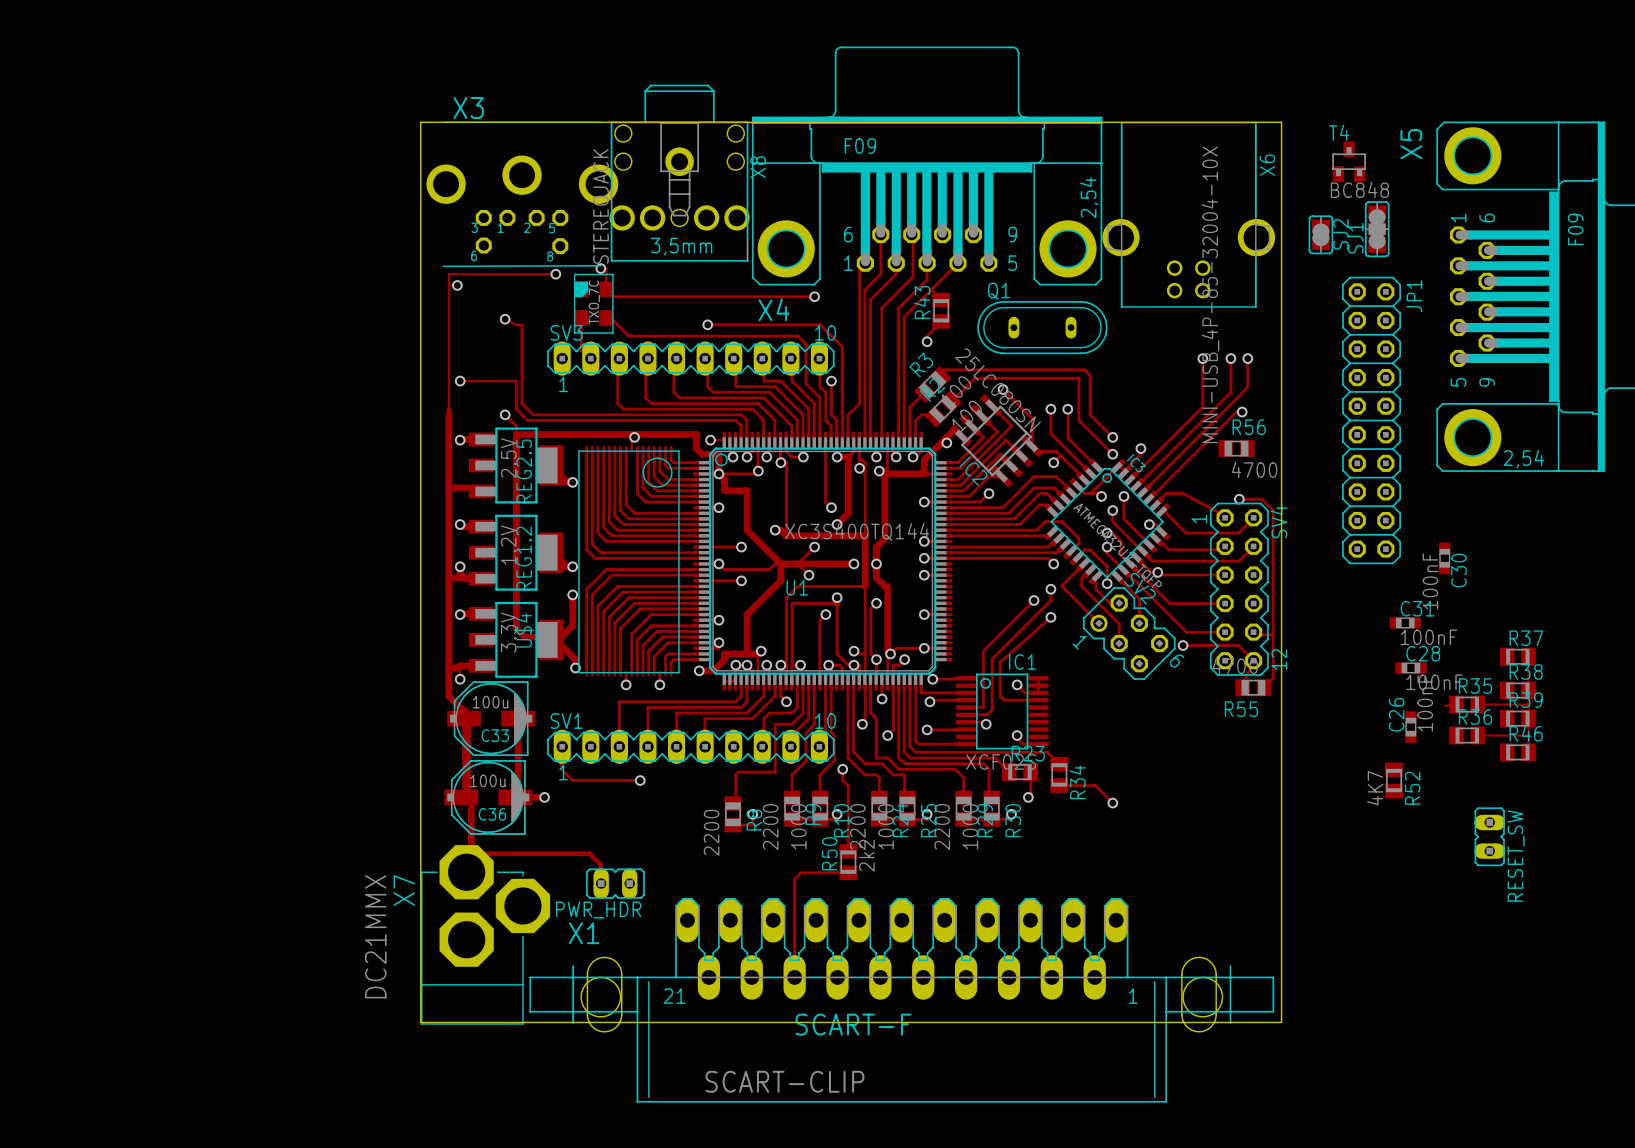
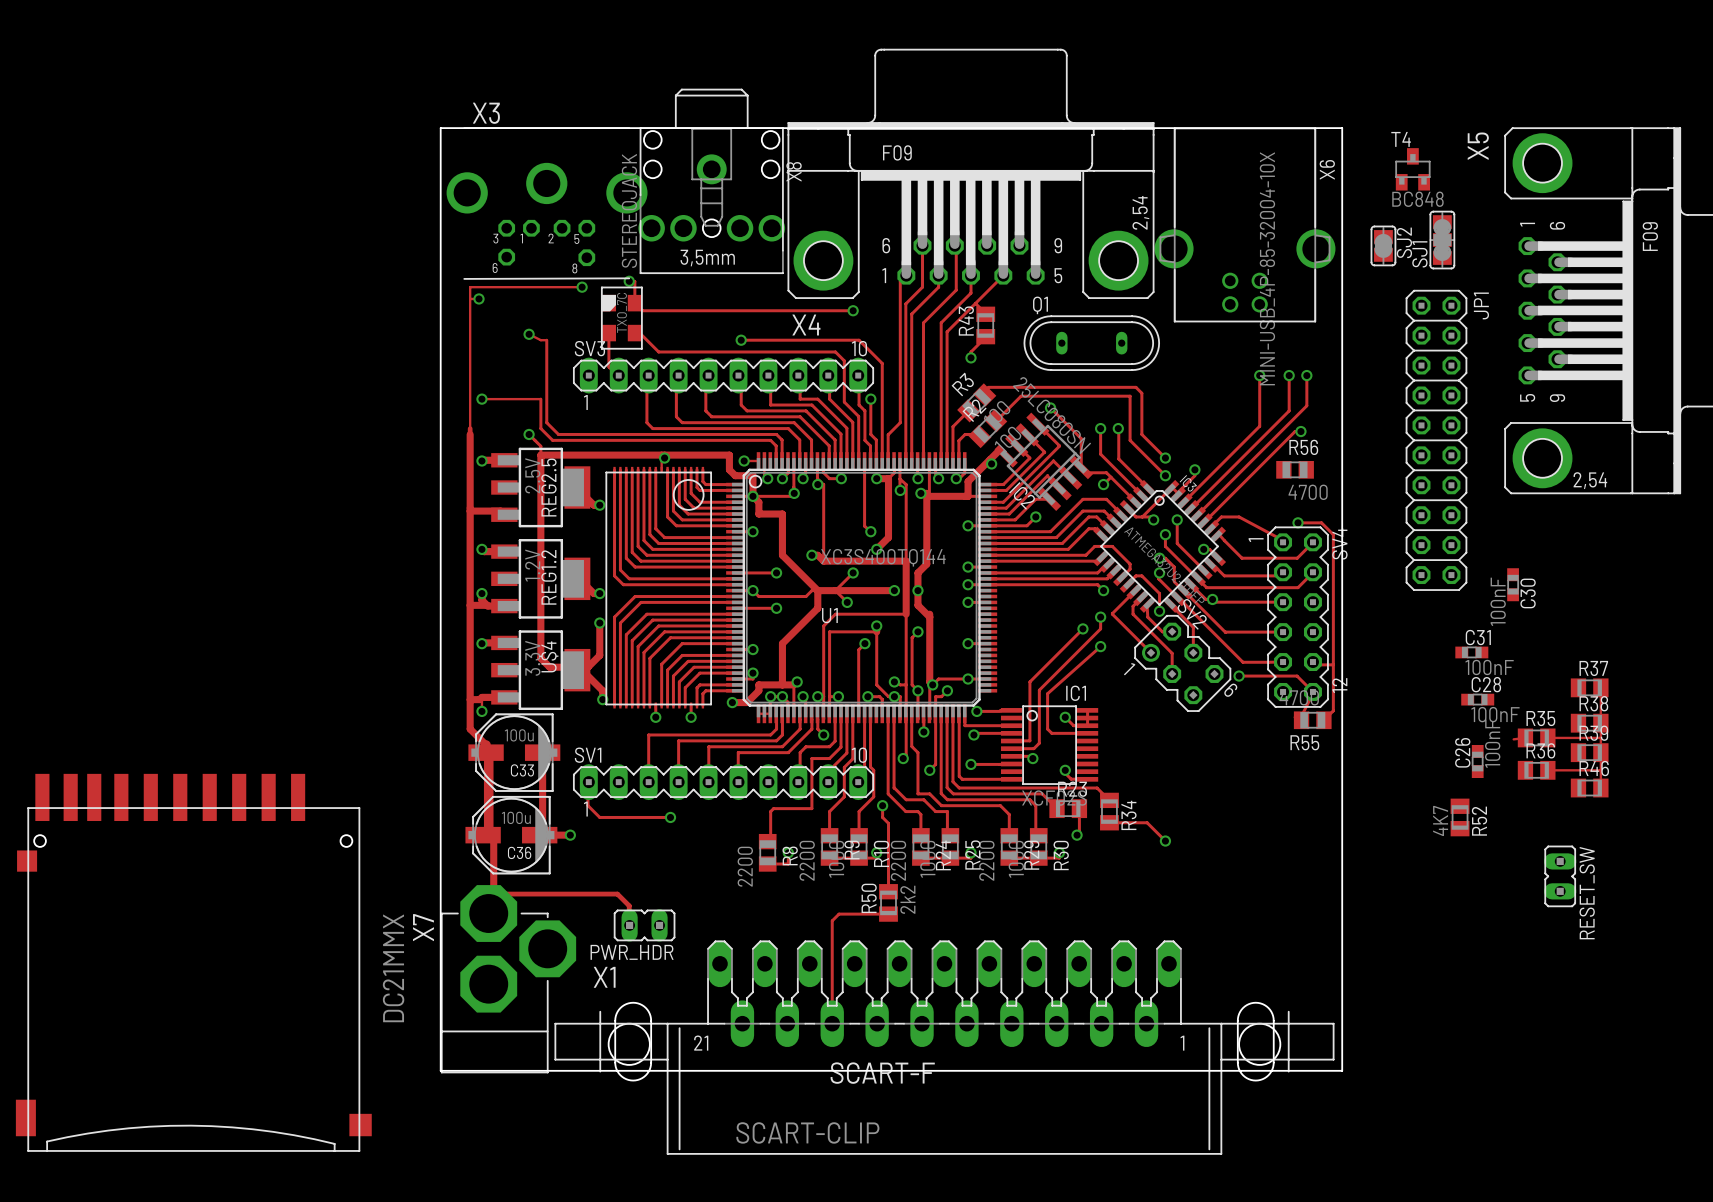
part: none -> (193, 962)

